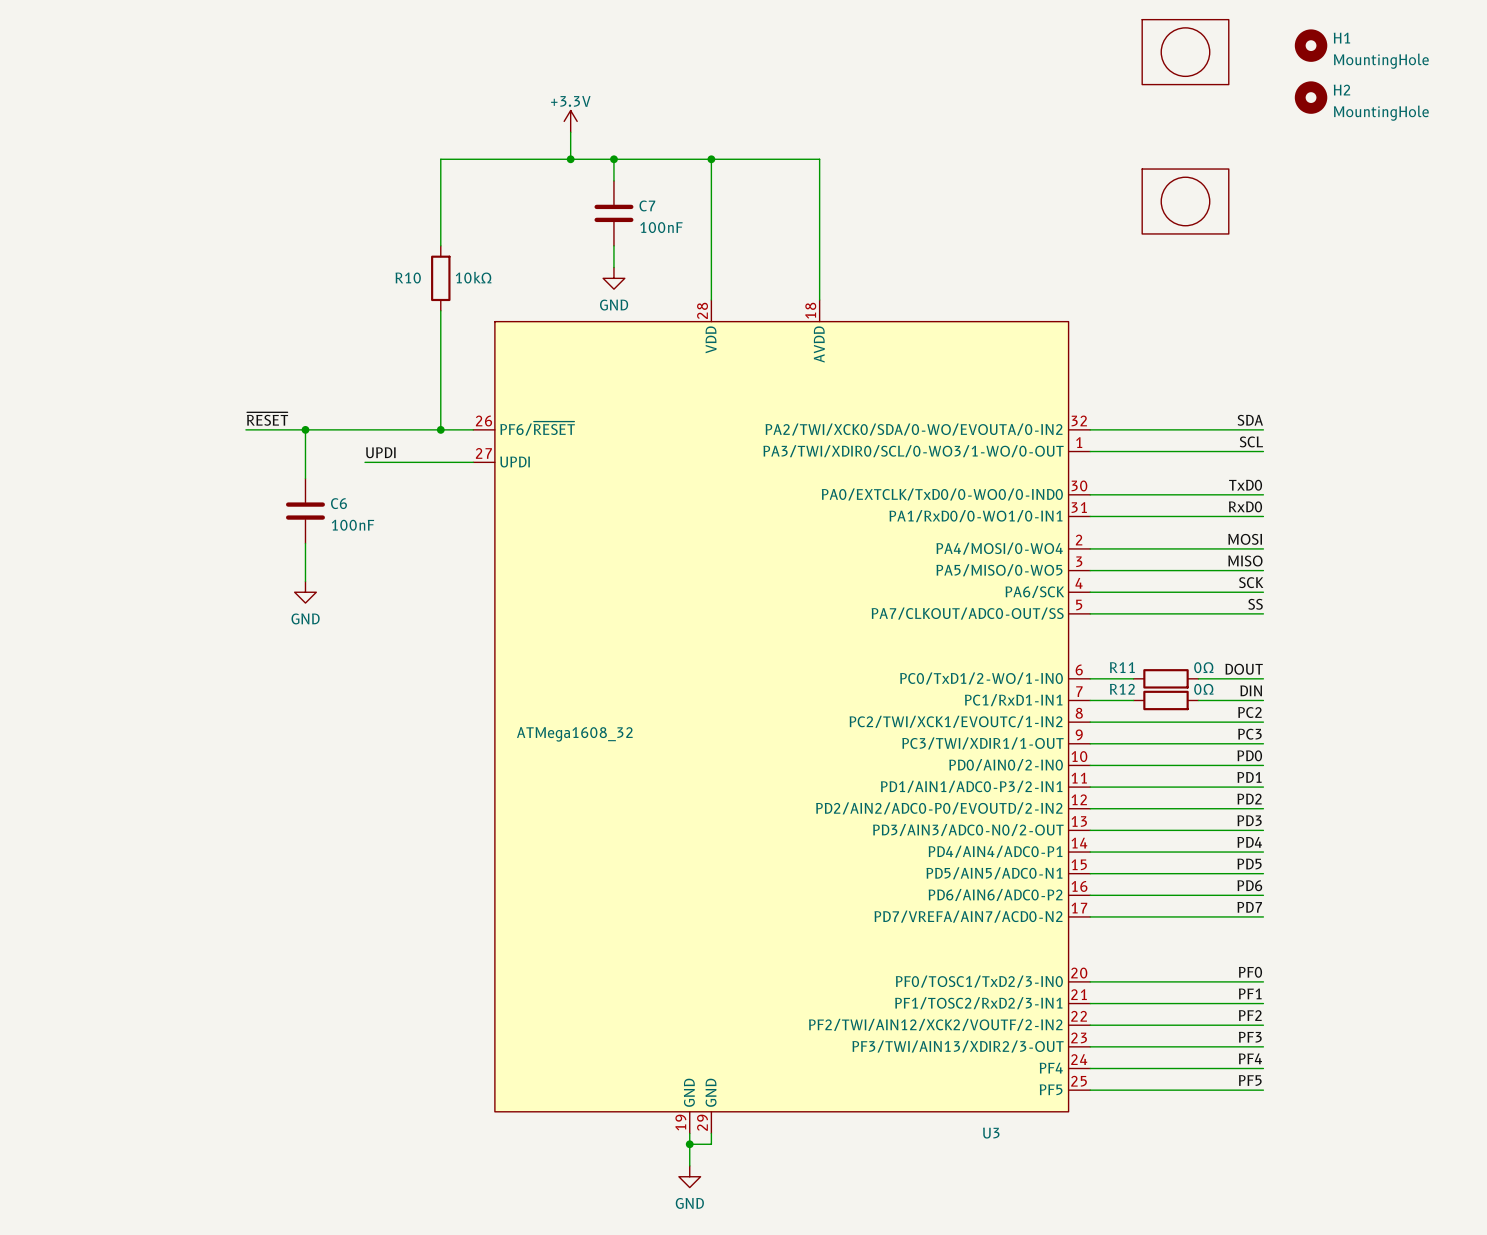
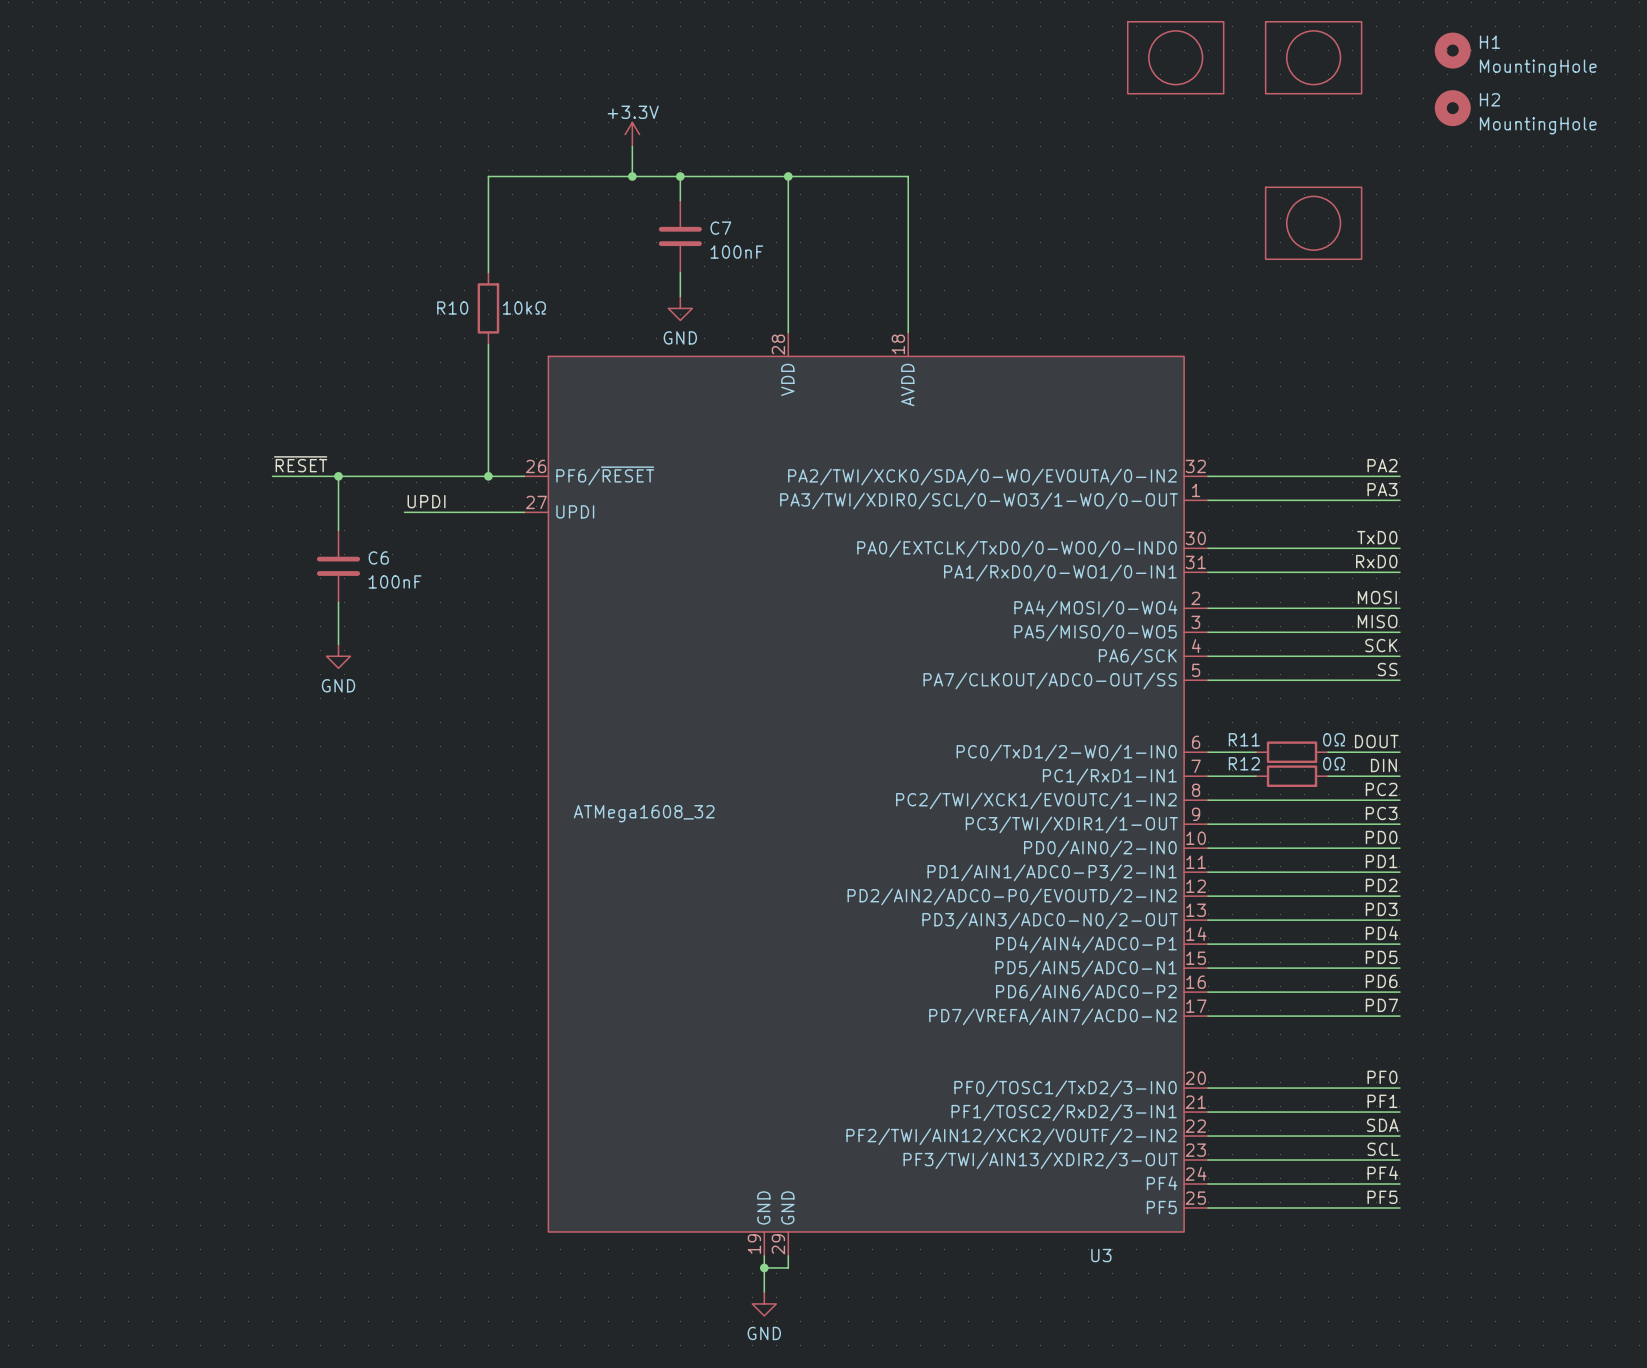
part: none -> (1175, 57)
label: SDA (1250, 420) -> PA2 (1382, 465)
label: SCL (1251, 441) -> PA3 (1382, 489)
label: PF2 (1250, 1015) -> SDA (1382, 1125)
label: PF3 (1250, 1037) -> SCL (1383, 1149)

